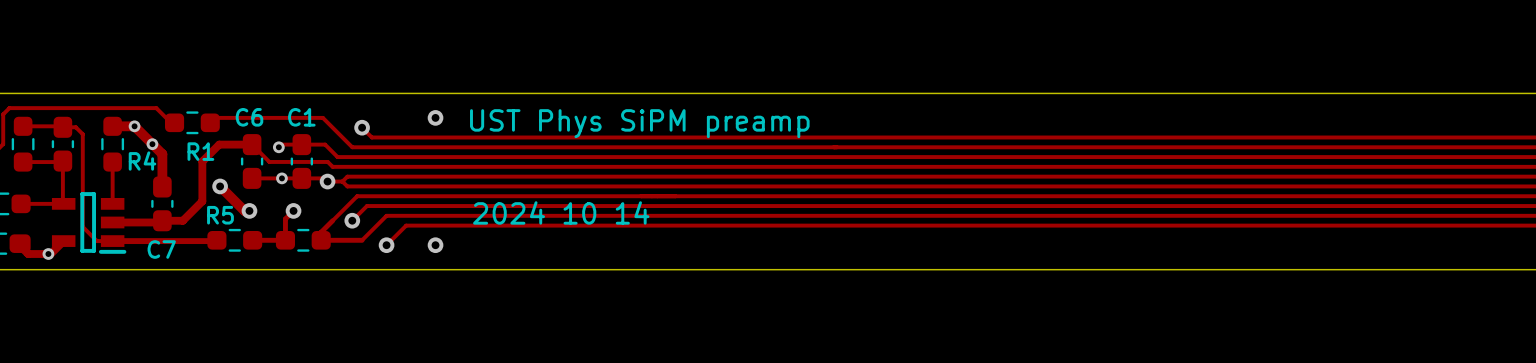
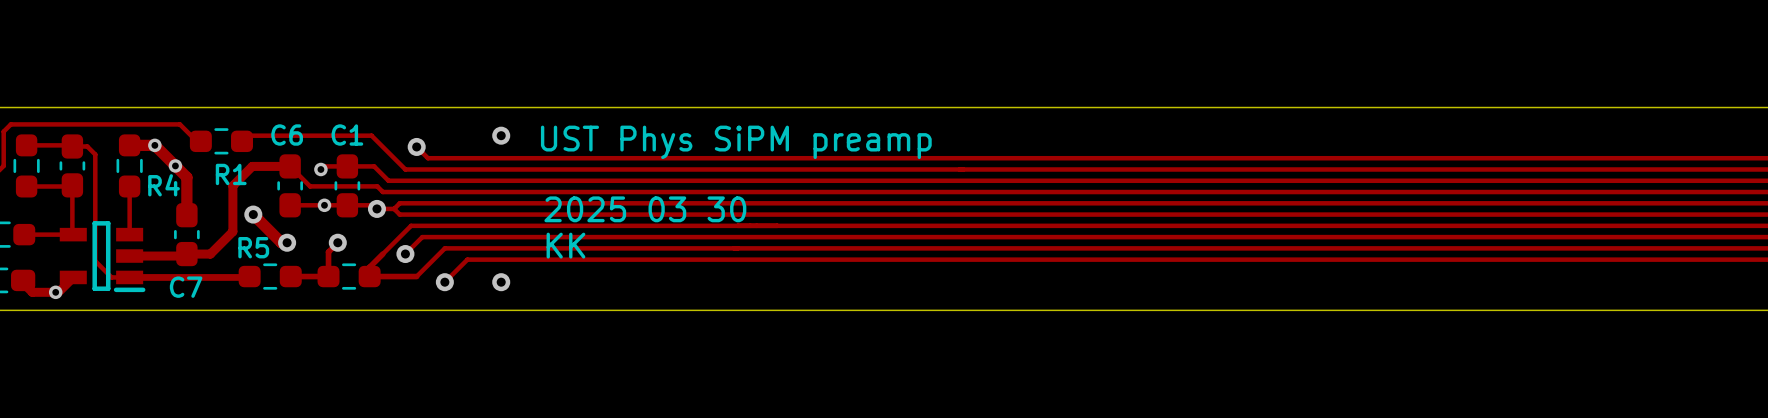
text: none -> 2025 03 30 (645, 209)
text: 2024 10 14 (561, 212) -> KK (565, 245)

